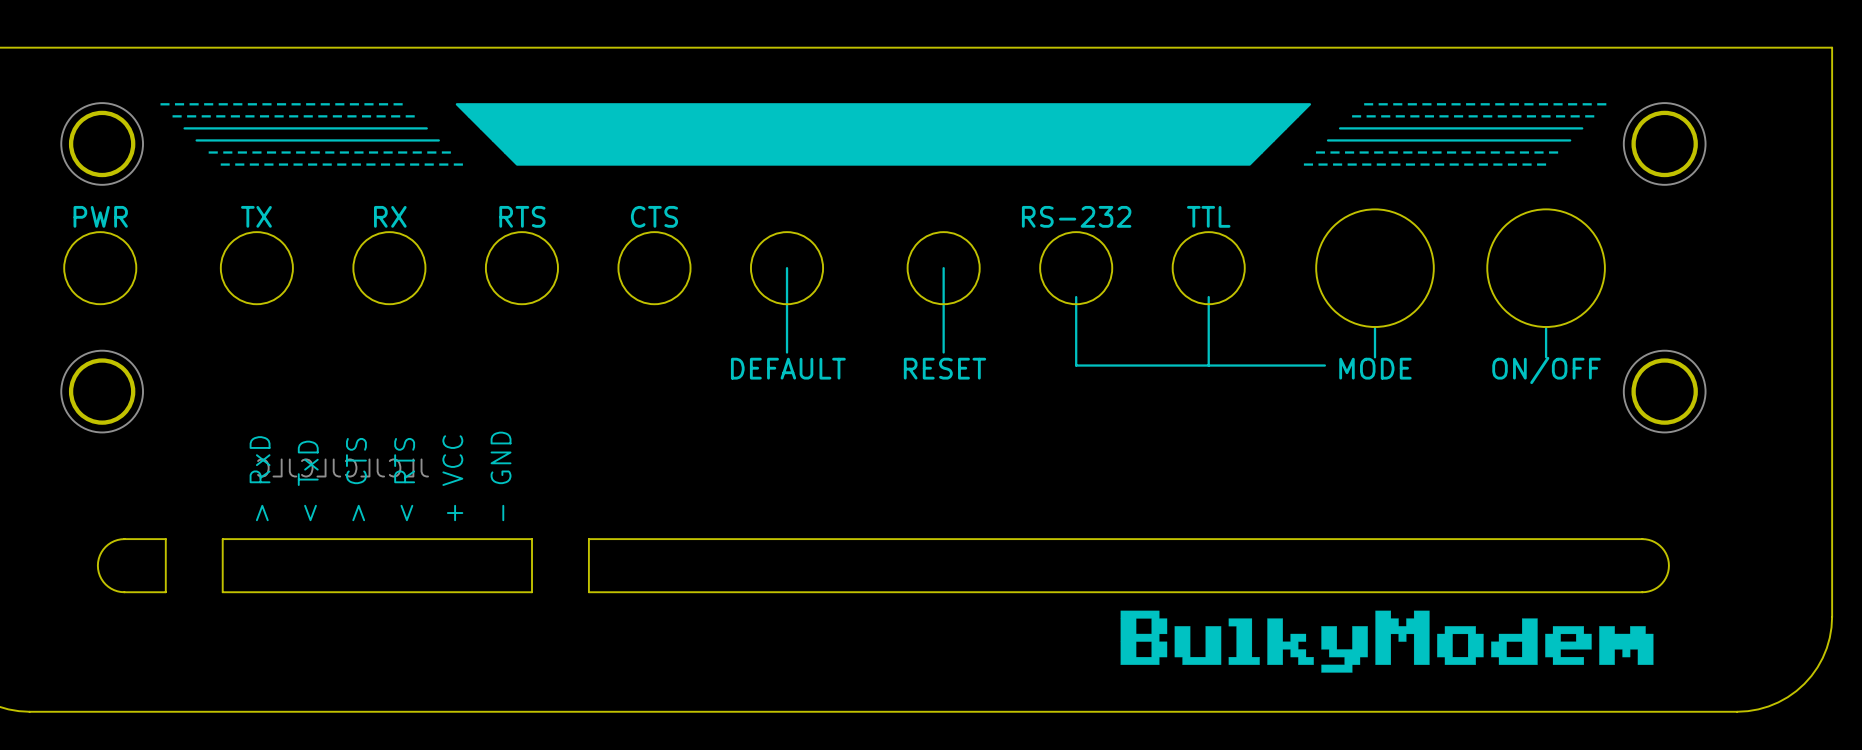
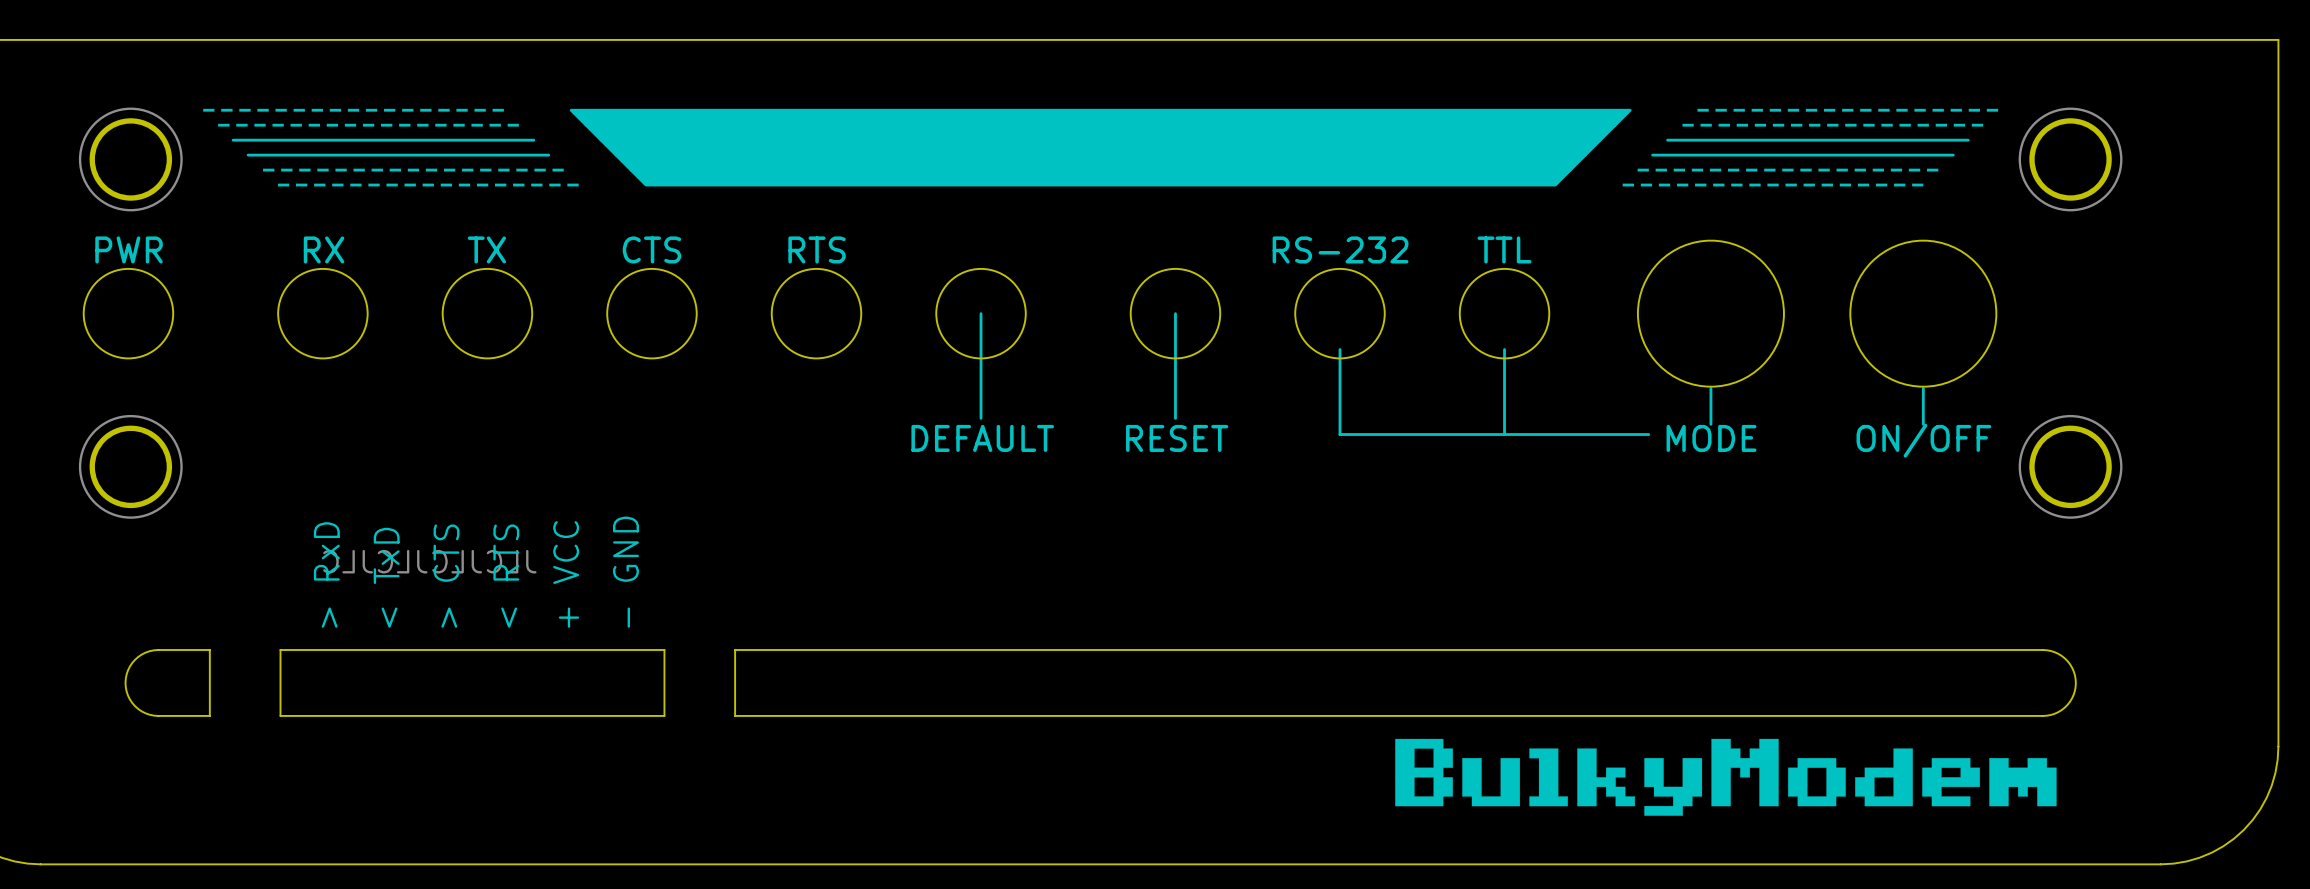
text: TX (256, 216) -> RX (324, 249)
text: RX (390, 216) -> TX (486, 249)
text: RTS (522, 216) -> CTS (651, 249)
text: CTS (654, 216) -> RTS (817, 249)

